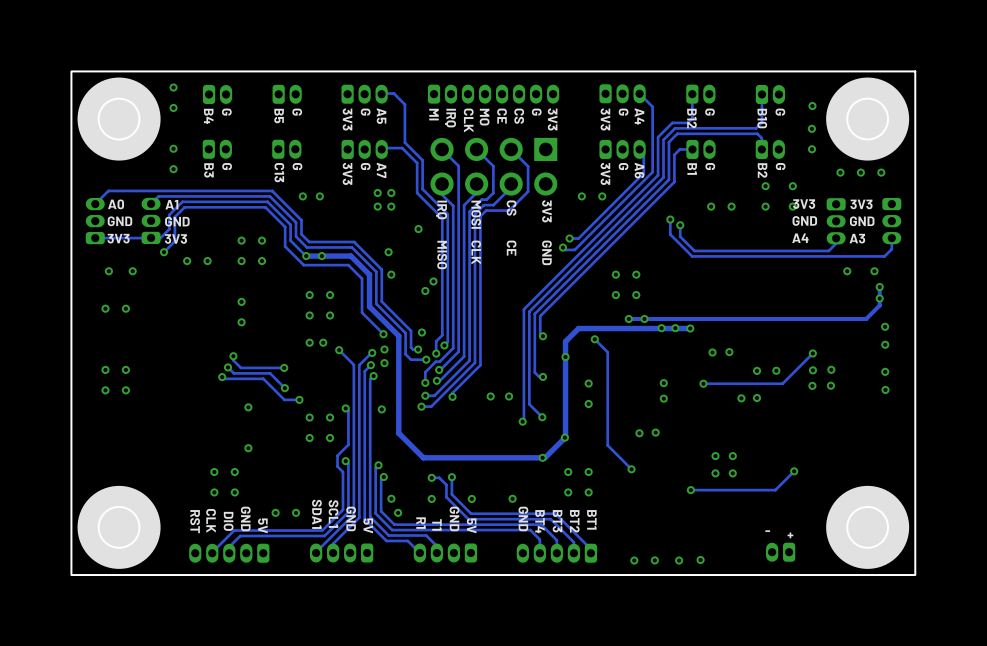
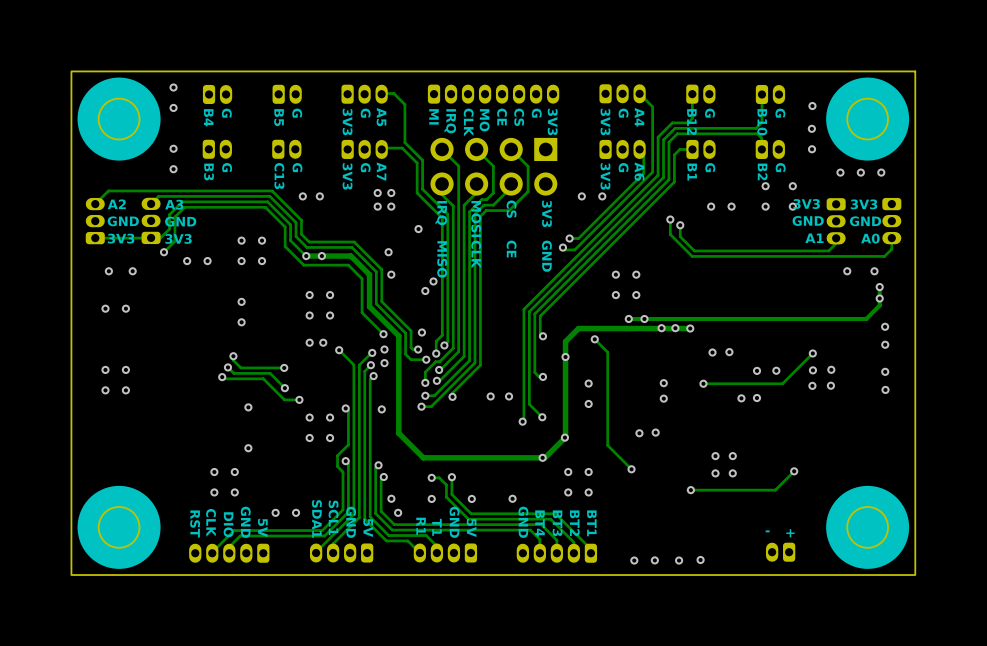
text: A0 (116, 204) -> A2 (116, 204)
text: A1 (171, 204) -> A3 (174, 204)
text: A4 (800, 238) -> A1 (814, 238)
text: A3 (857, 238) -> A0 (870, 238)

